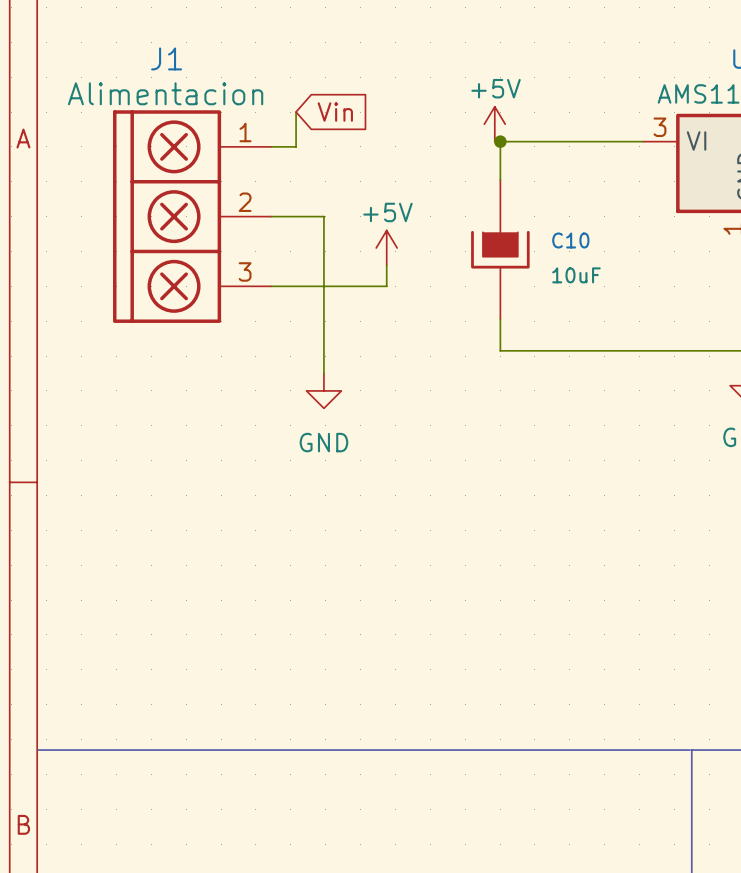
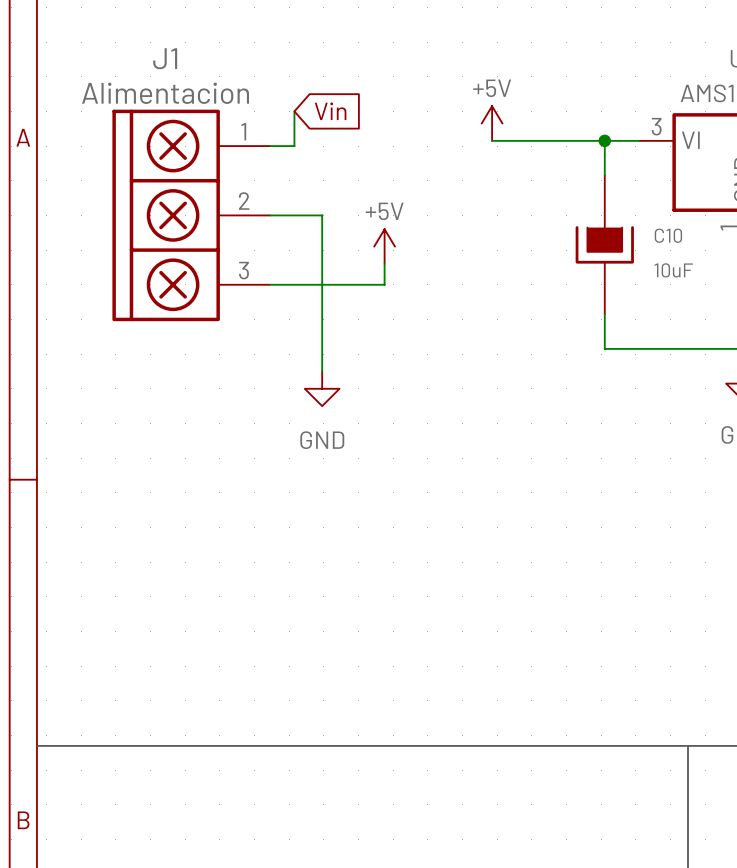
wire: (500, 141) (500, 180) -> none
junction: (500, 141) -> none
wire: none -> (604, 140) (604, 175)
junction: none -> (604, 140)
C10 position: (500, 249) -> (604, 244)
wire: (500, 319) (500, 350) (608, 350) -> (604, 314) (604, 348)

